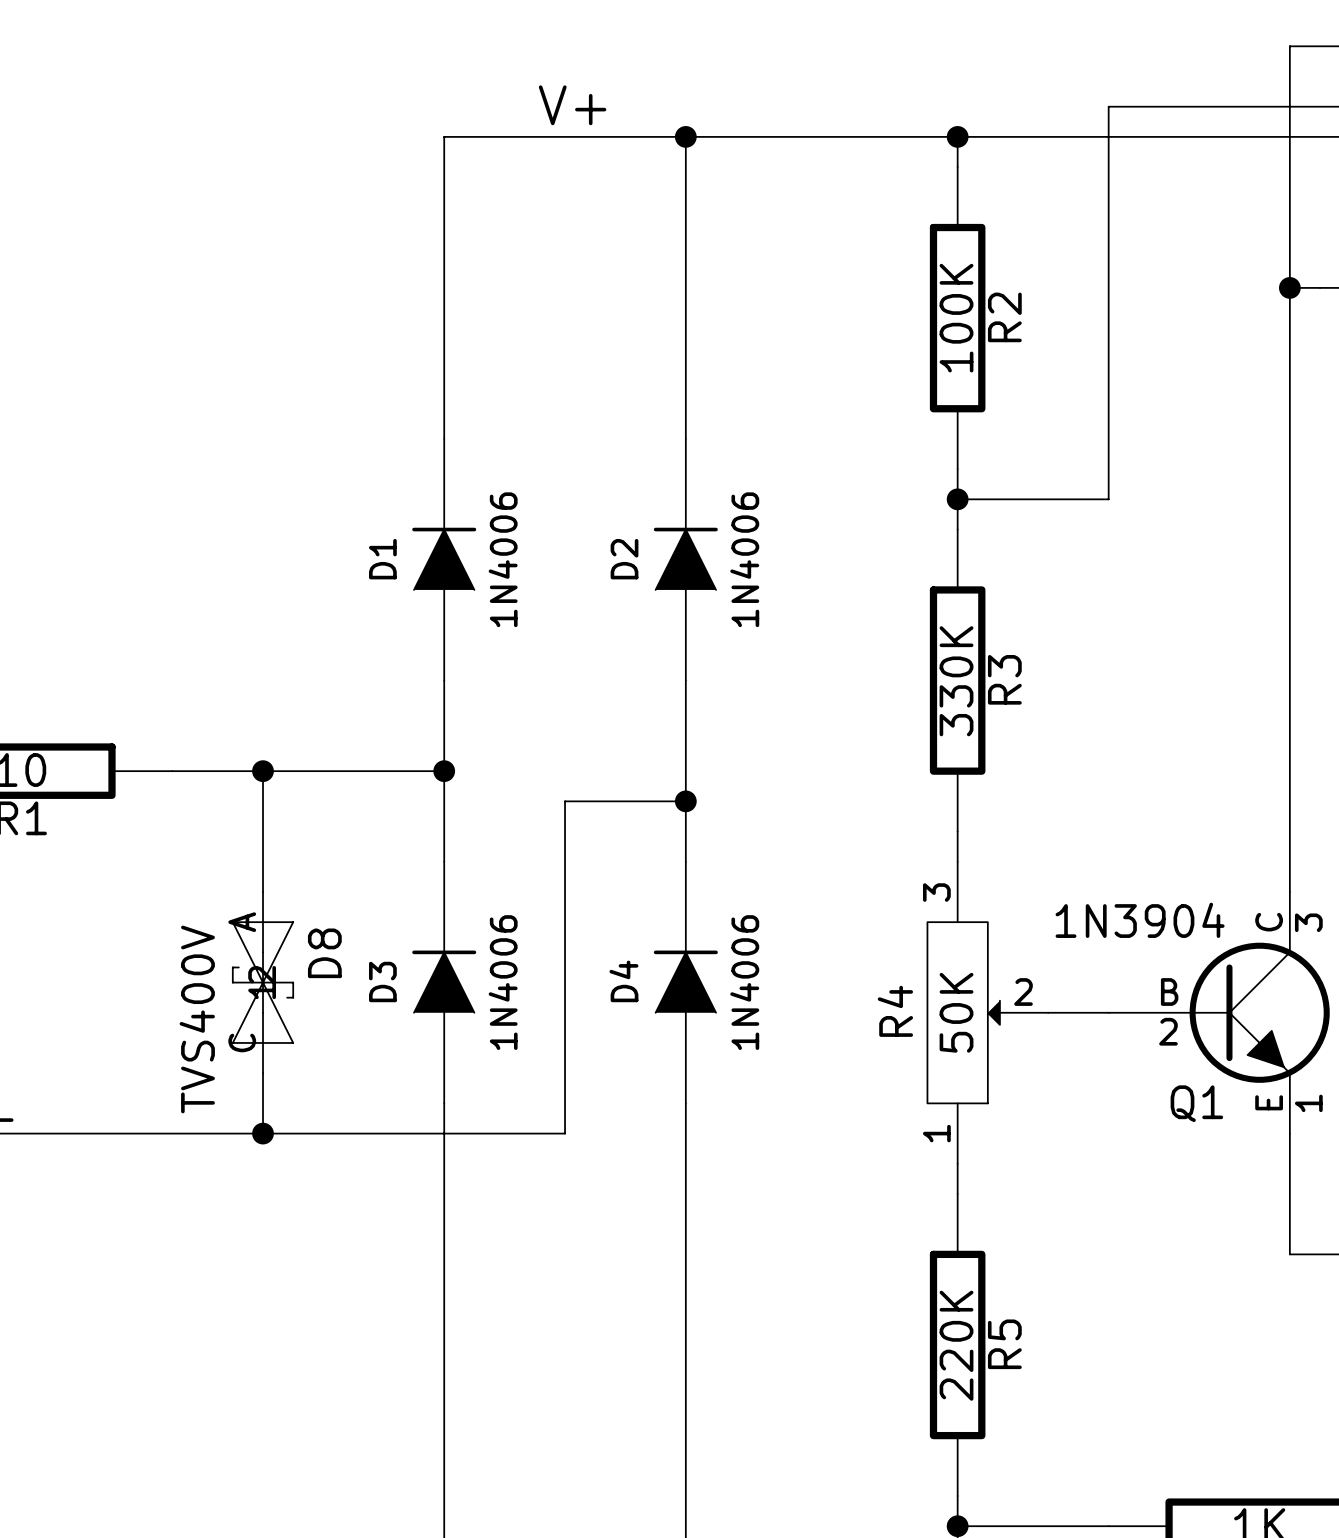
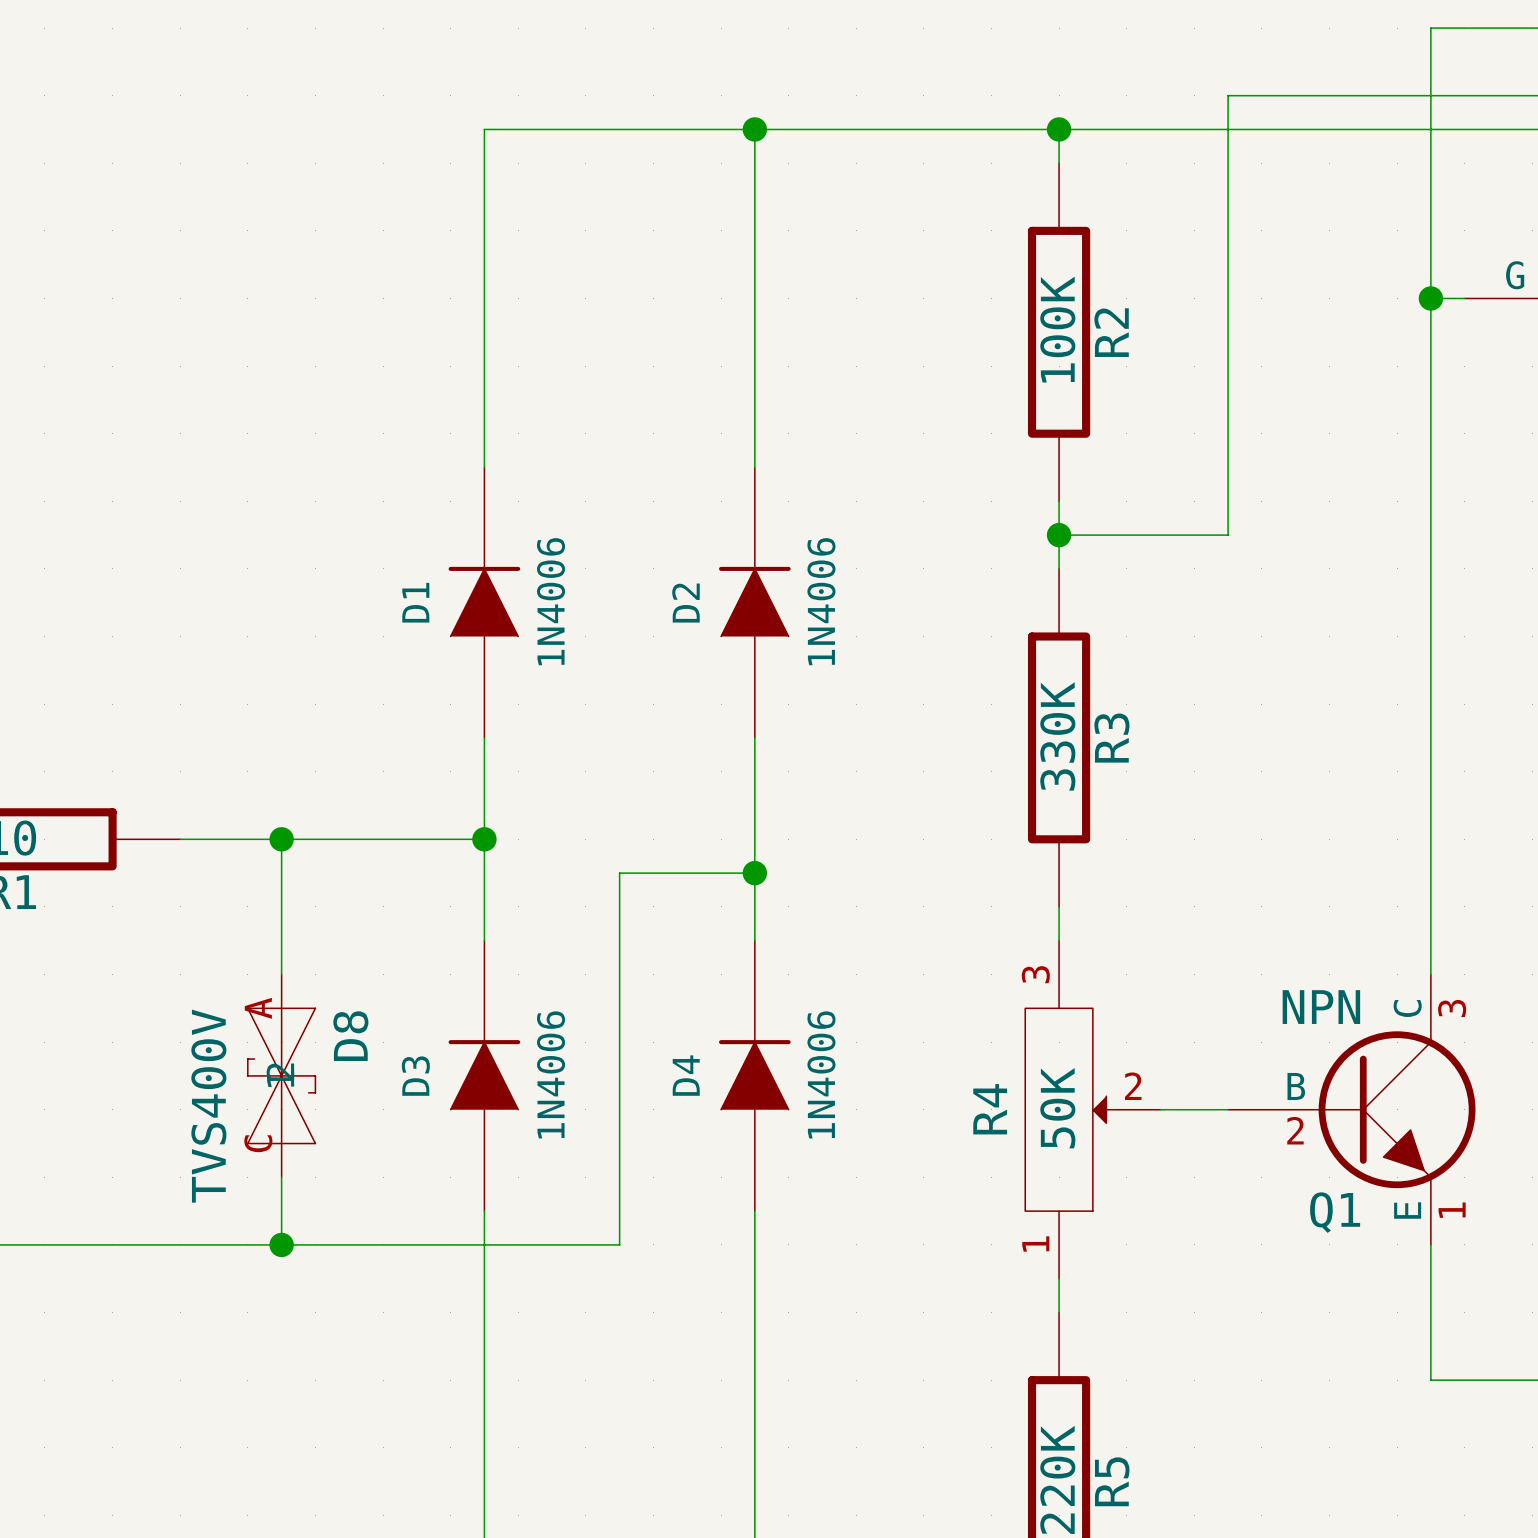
label: V+ (572, 105) -> none
Q1 value: 1N3904 (1140, 920) -> NPN (1321, 1007)

